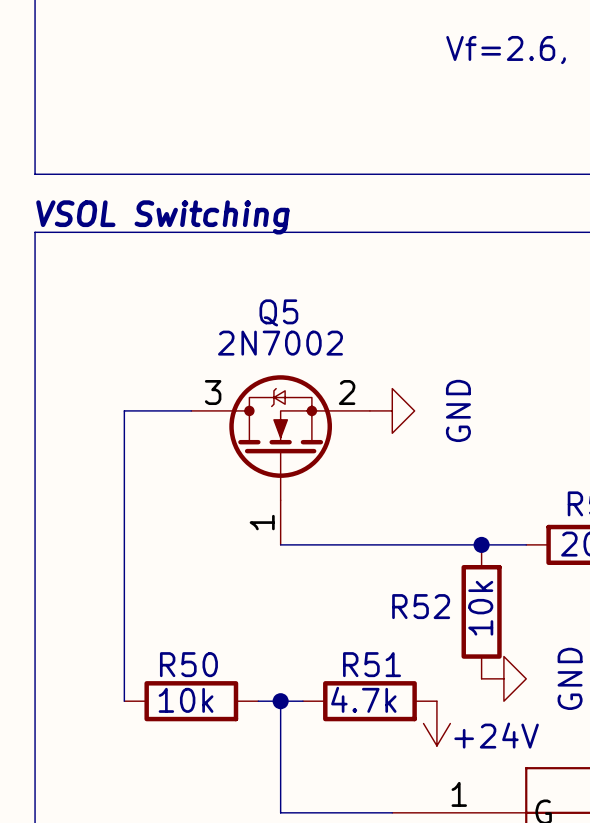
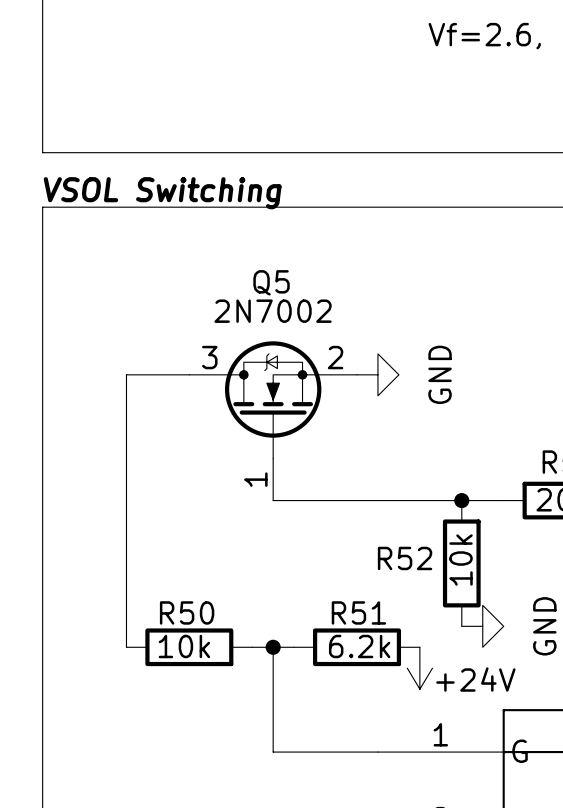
R51 value: 4.7k (363, 699) -> 6.2k (359, 646)

